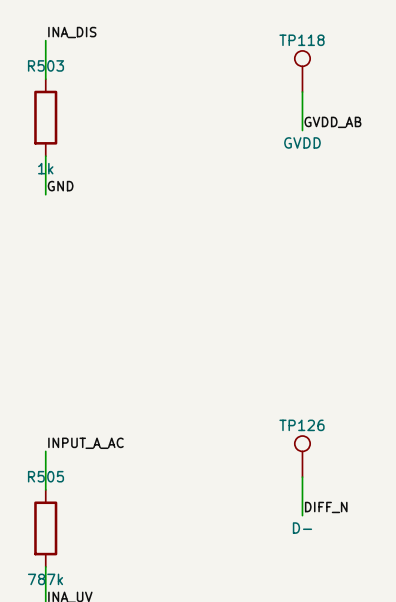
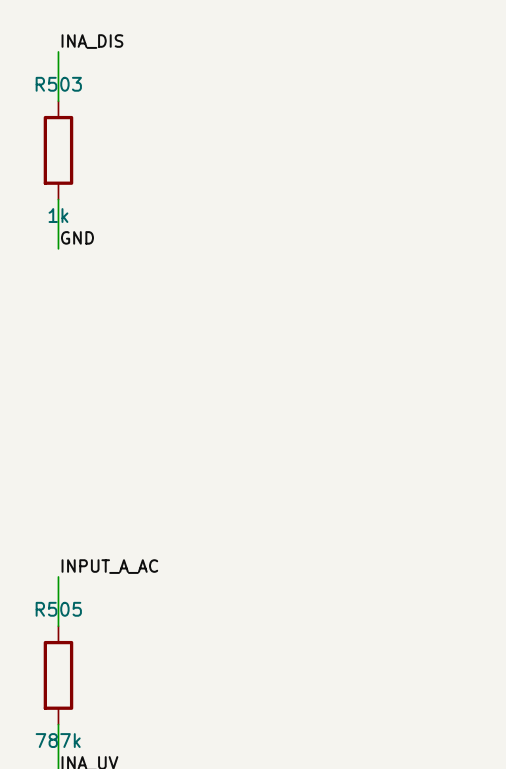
TP118: GVDD (302, 71) -> none
wire: (302, 91) (302, 130) -> none
label: GVDD_AB (332, 122) -> none
TP126: D- (302, 456) -> none
wire: (302, 477) (302, 515) -> none
label: DIFF_N (326, 507) -> none

